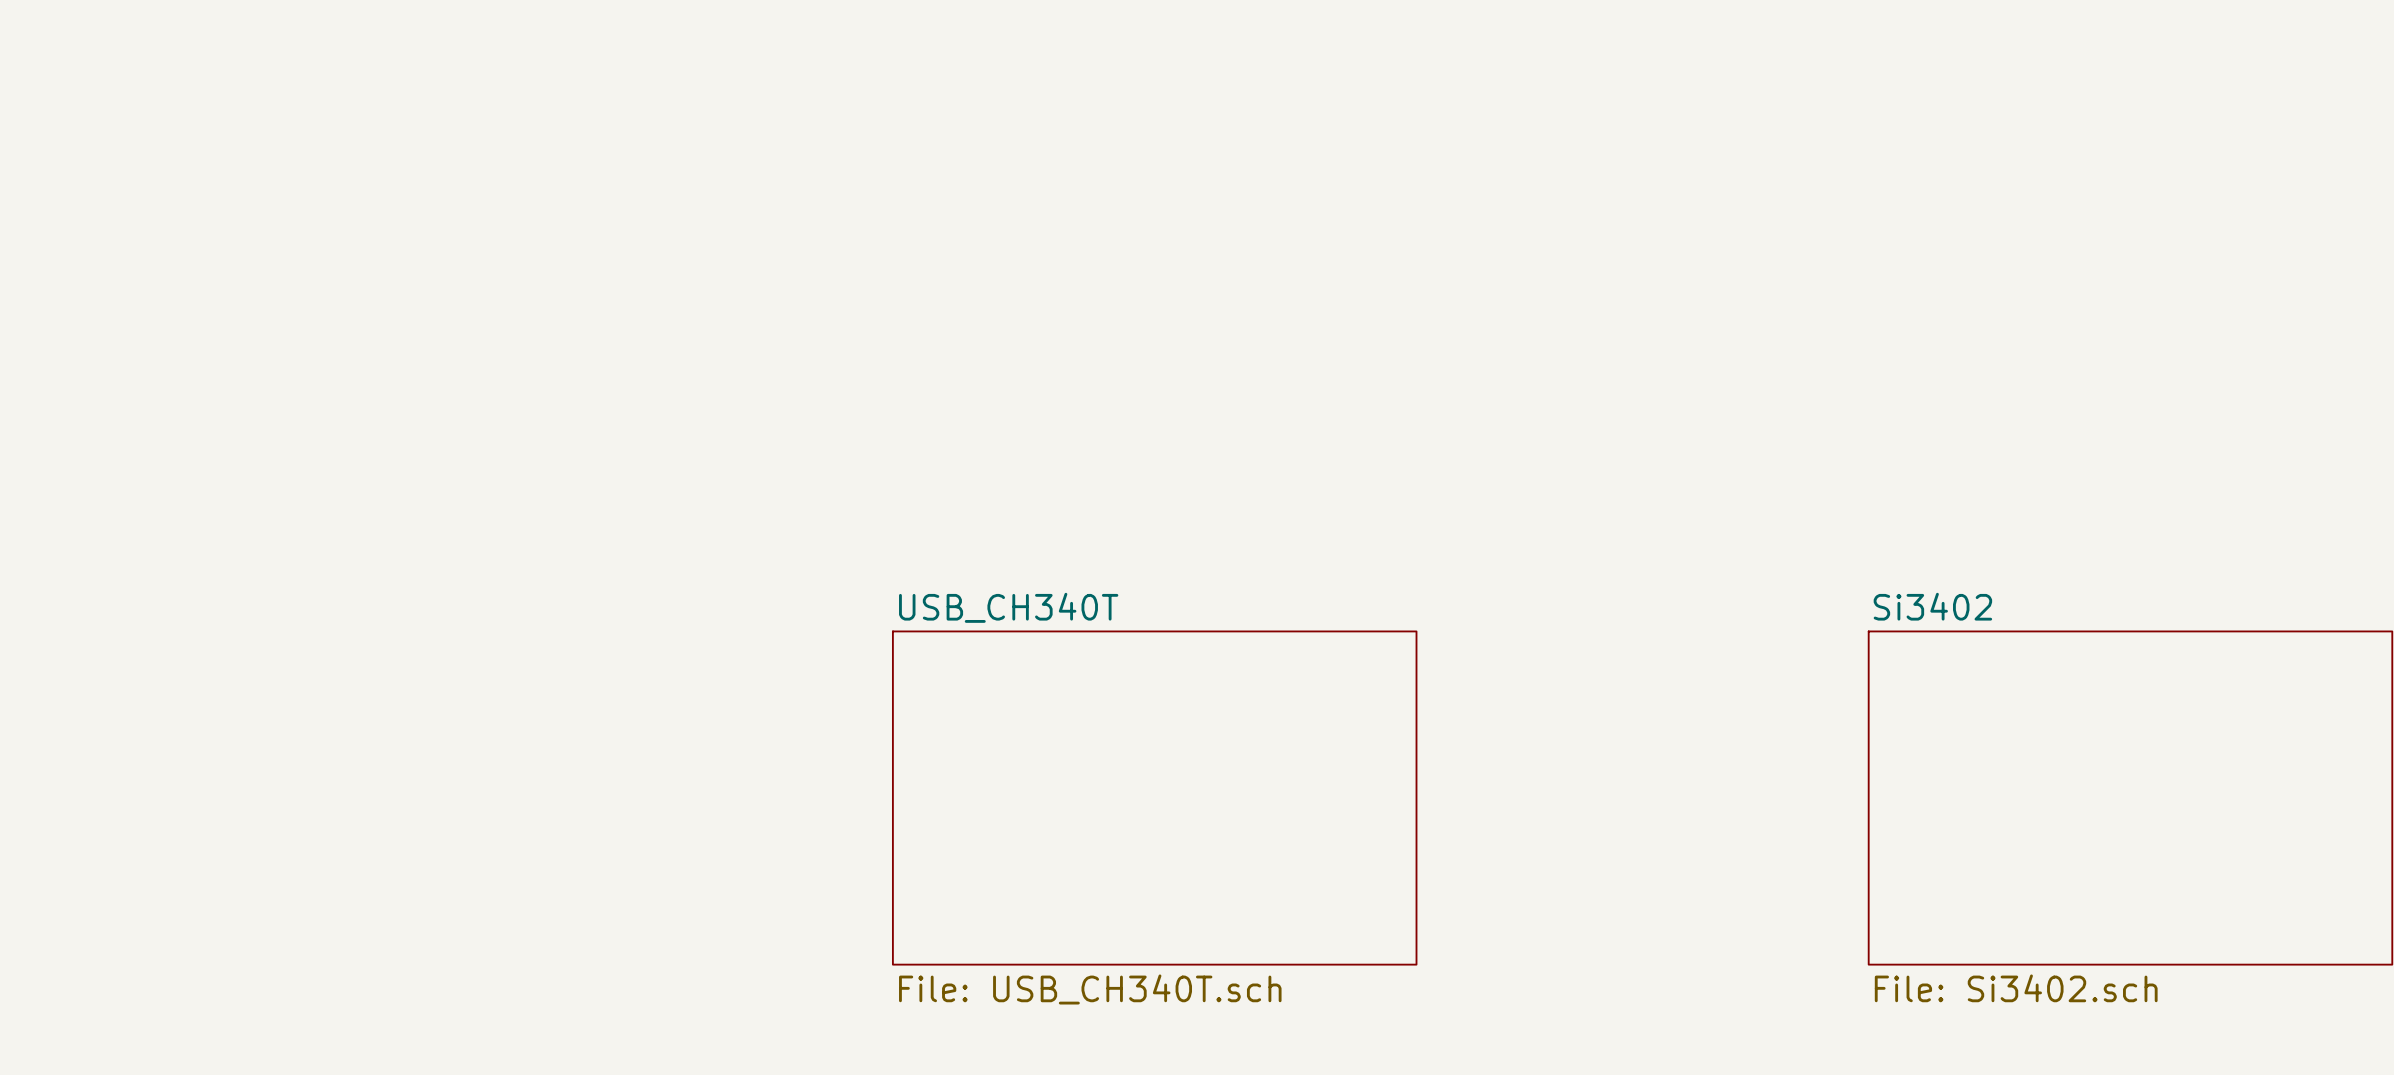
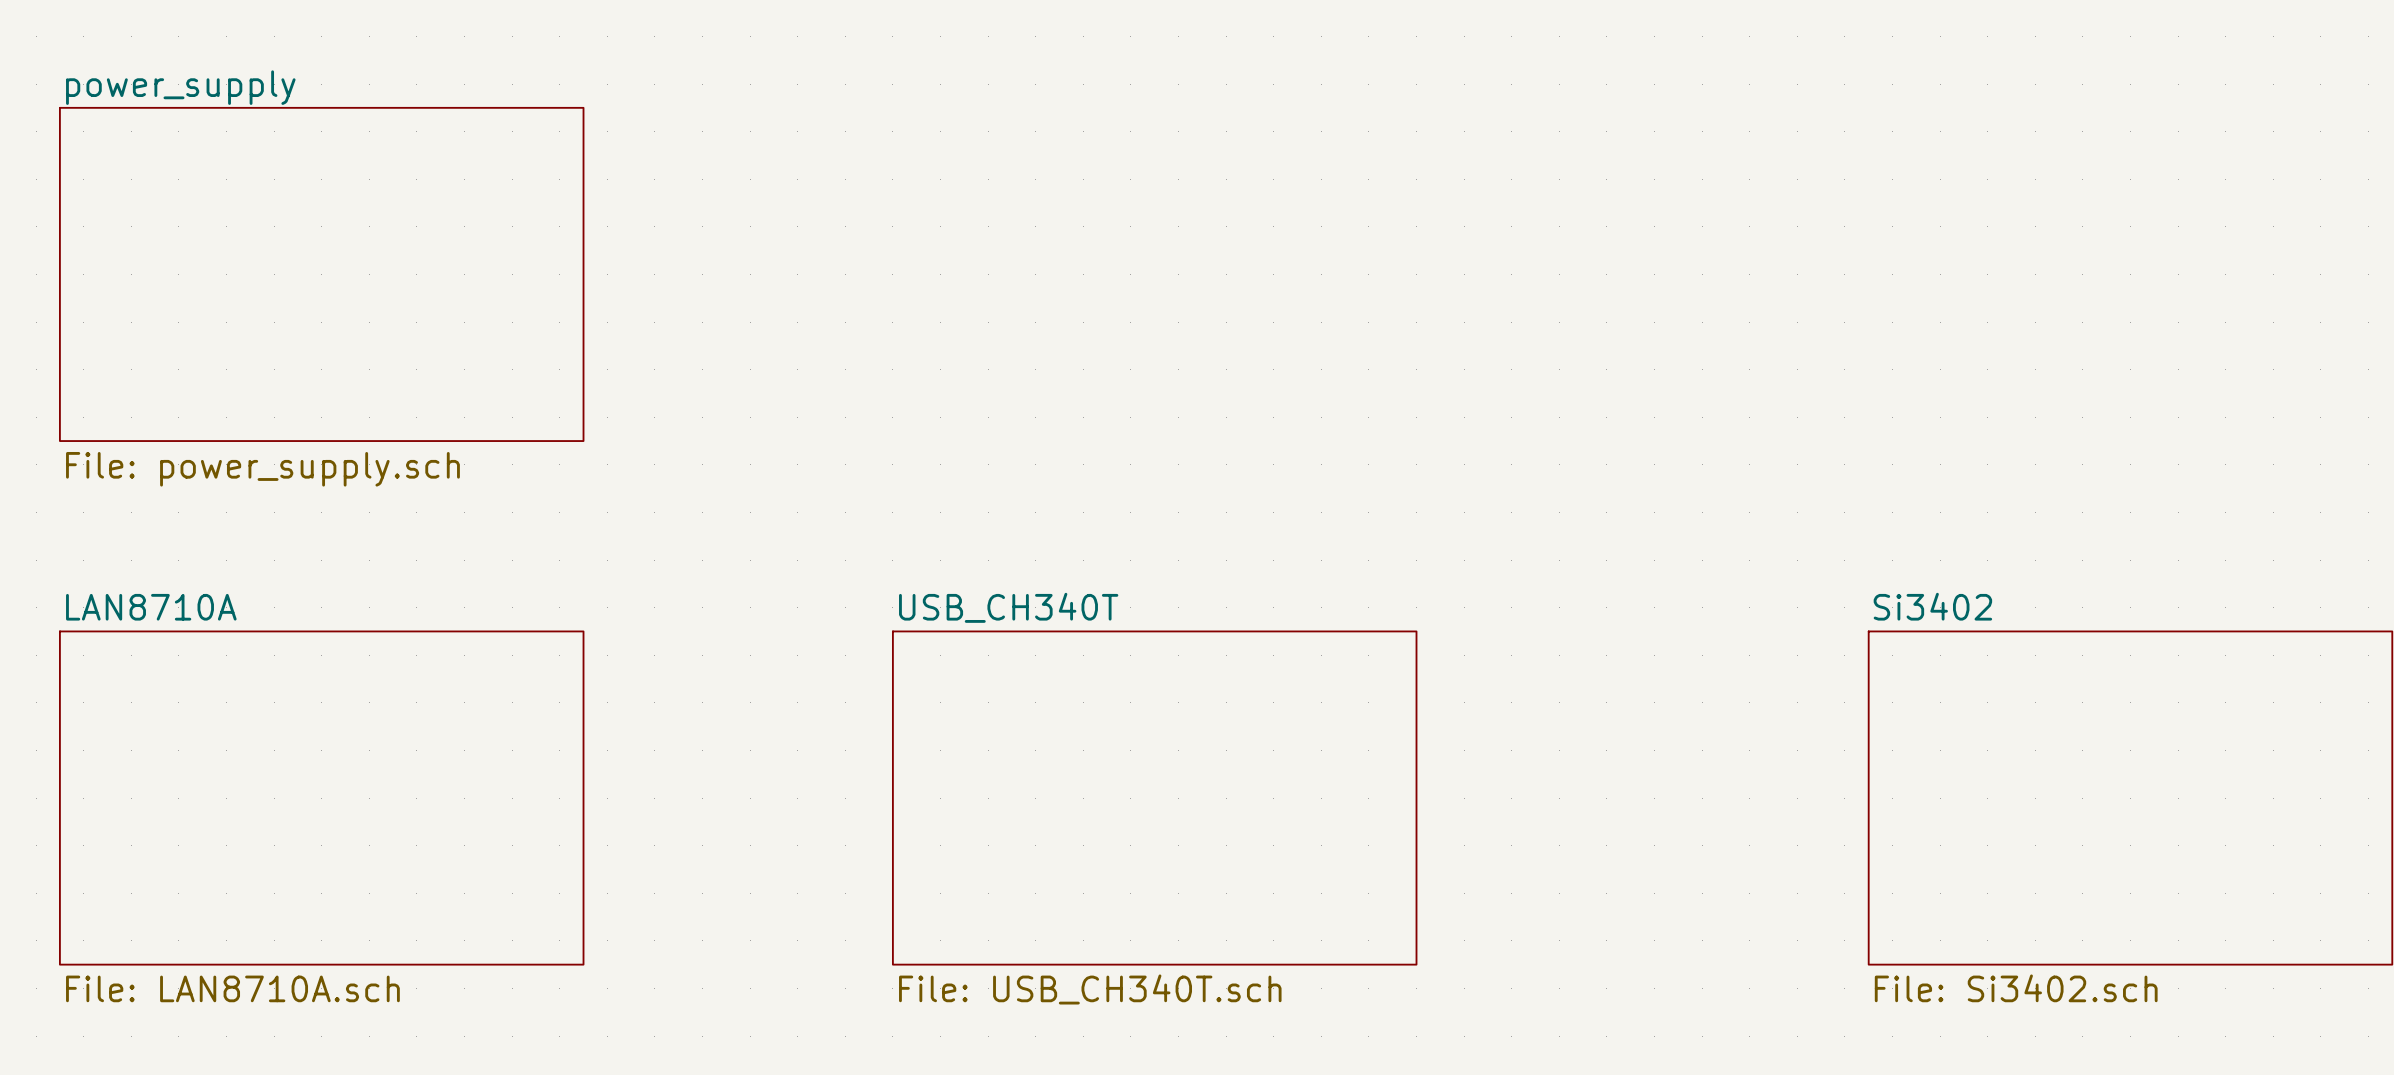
sheet power_supply: none -> File: power_supply.sch (321, 274)
sheet LAN8710A: none -> File: LAN8710A.sch (321, 798)

